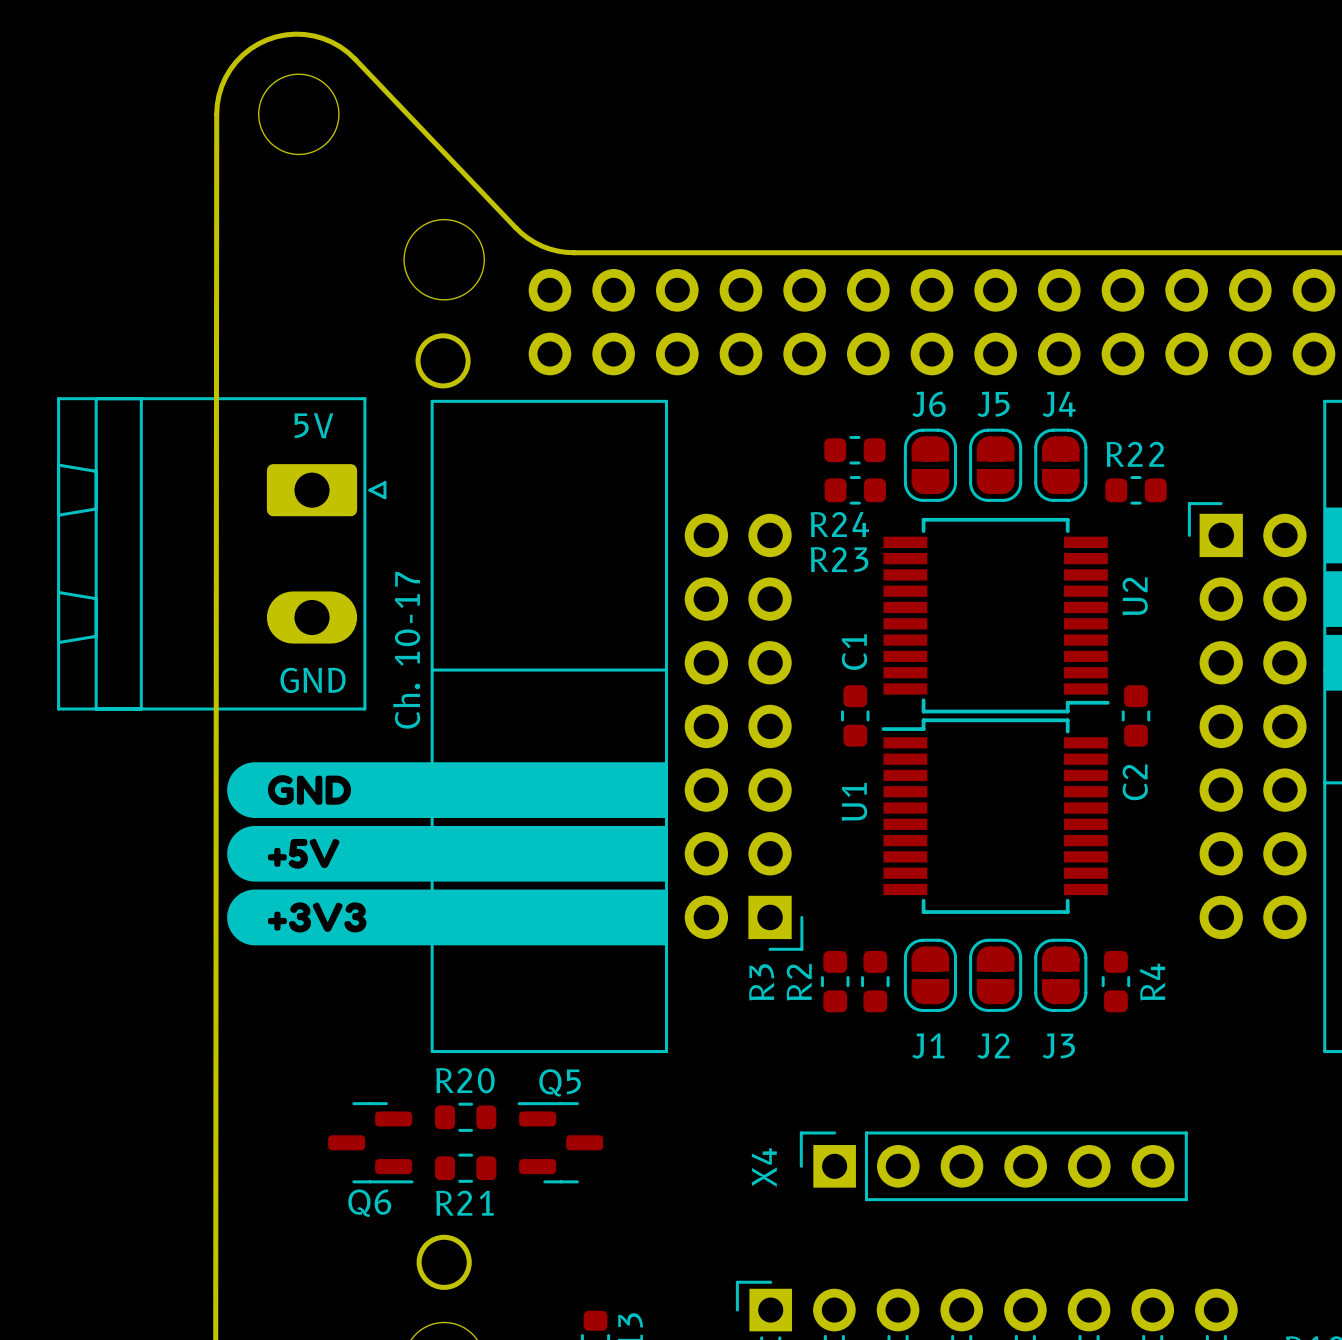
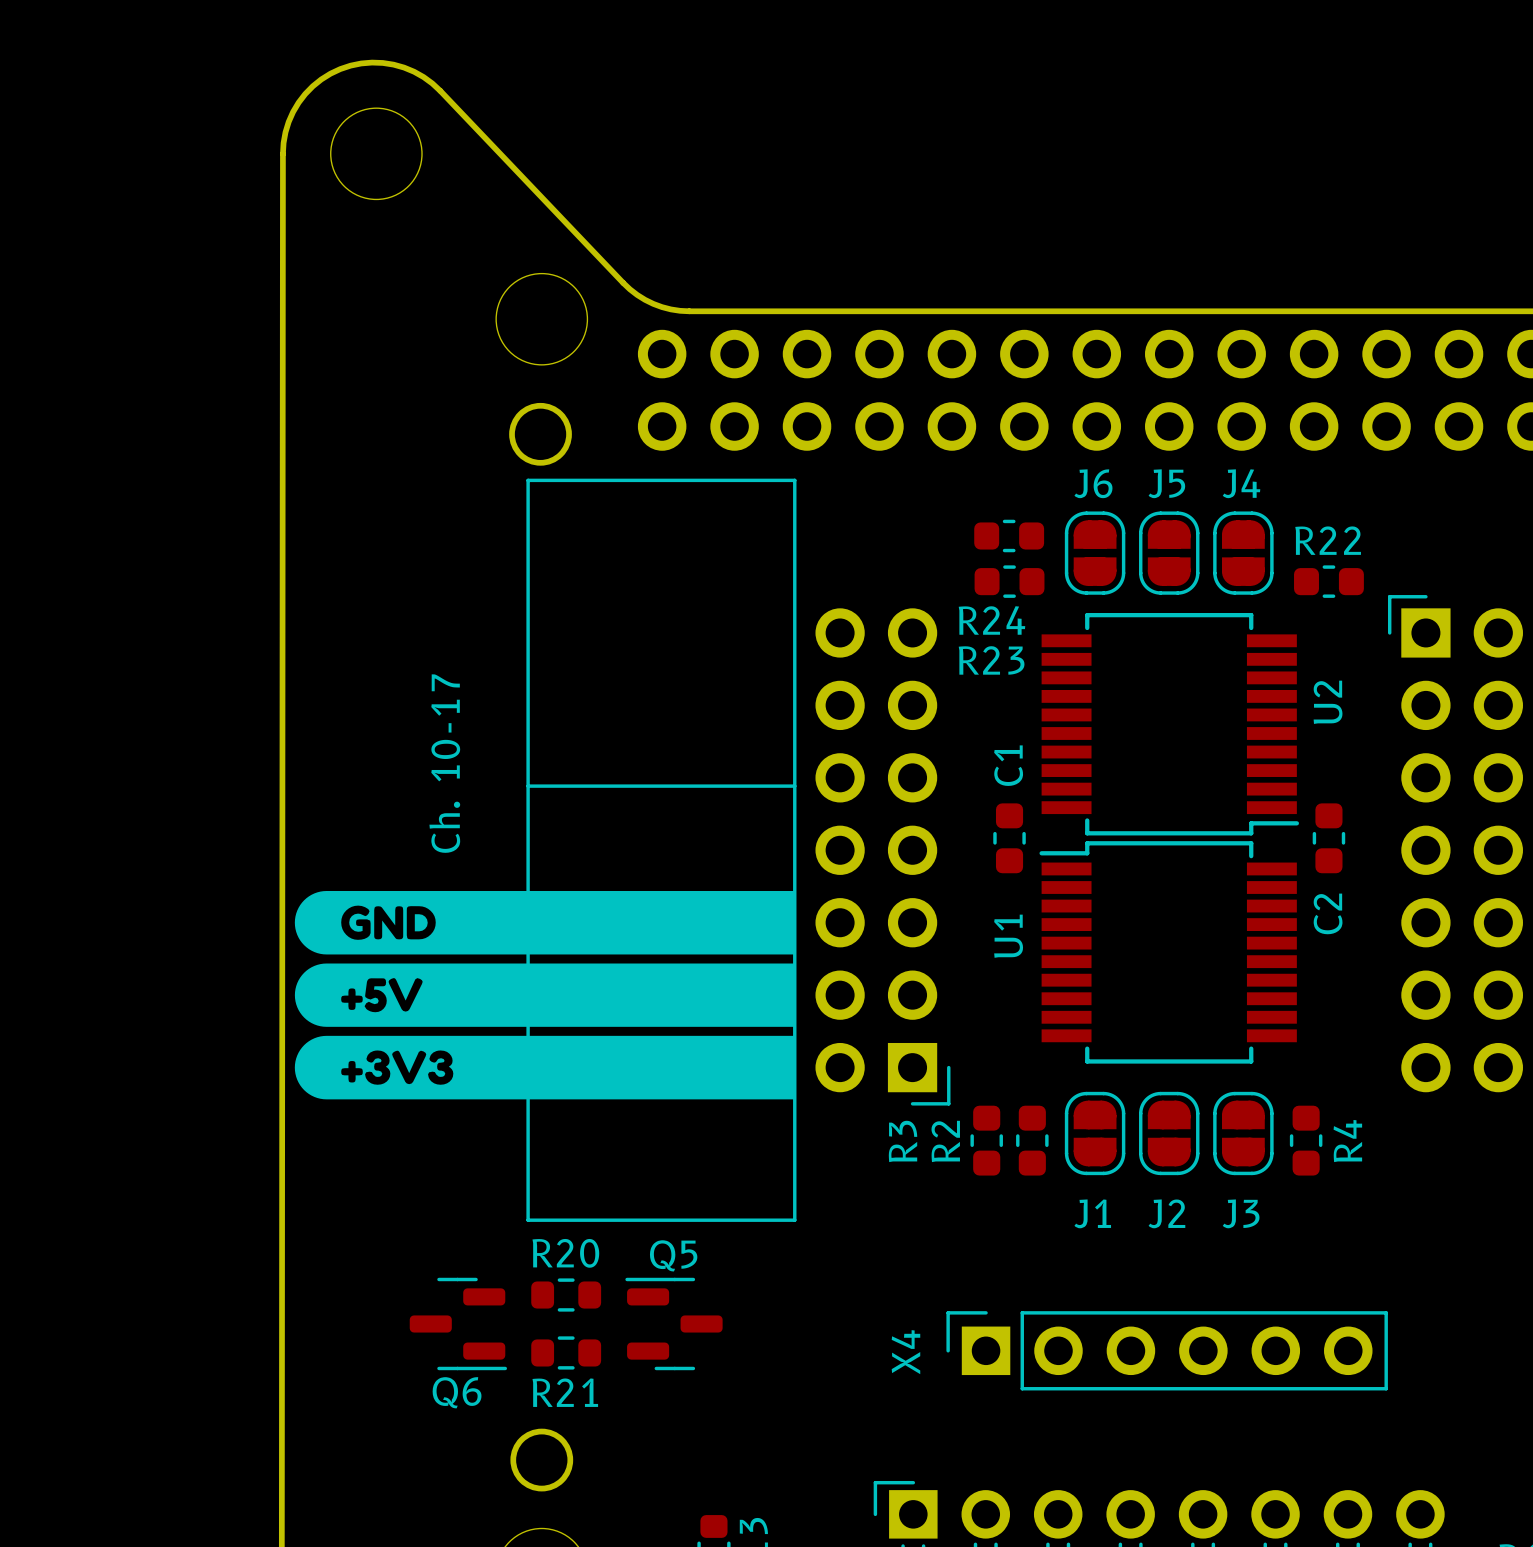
text: 5V (313, 425) -> none
part: (221, 553) -> none
text position: Ch. 10-17 (406, 650) -> Ch. 10-17 (444, 763)
text: GND (313, 680) -> none

